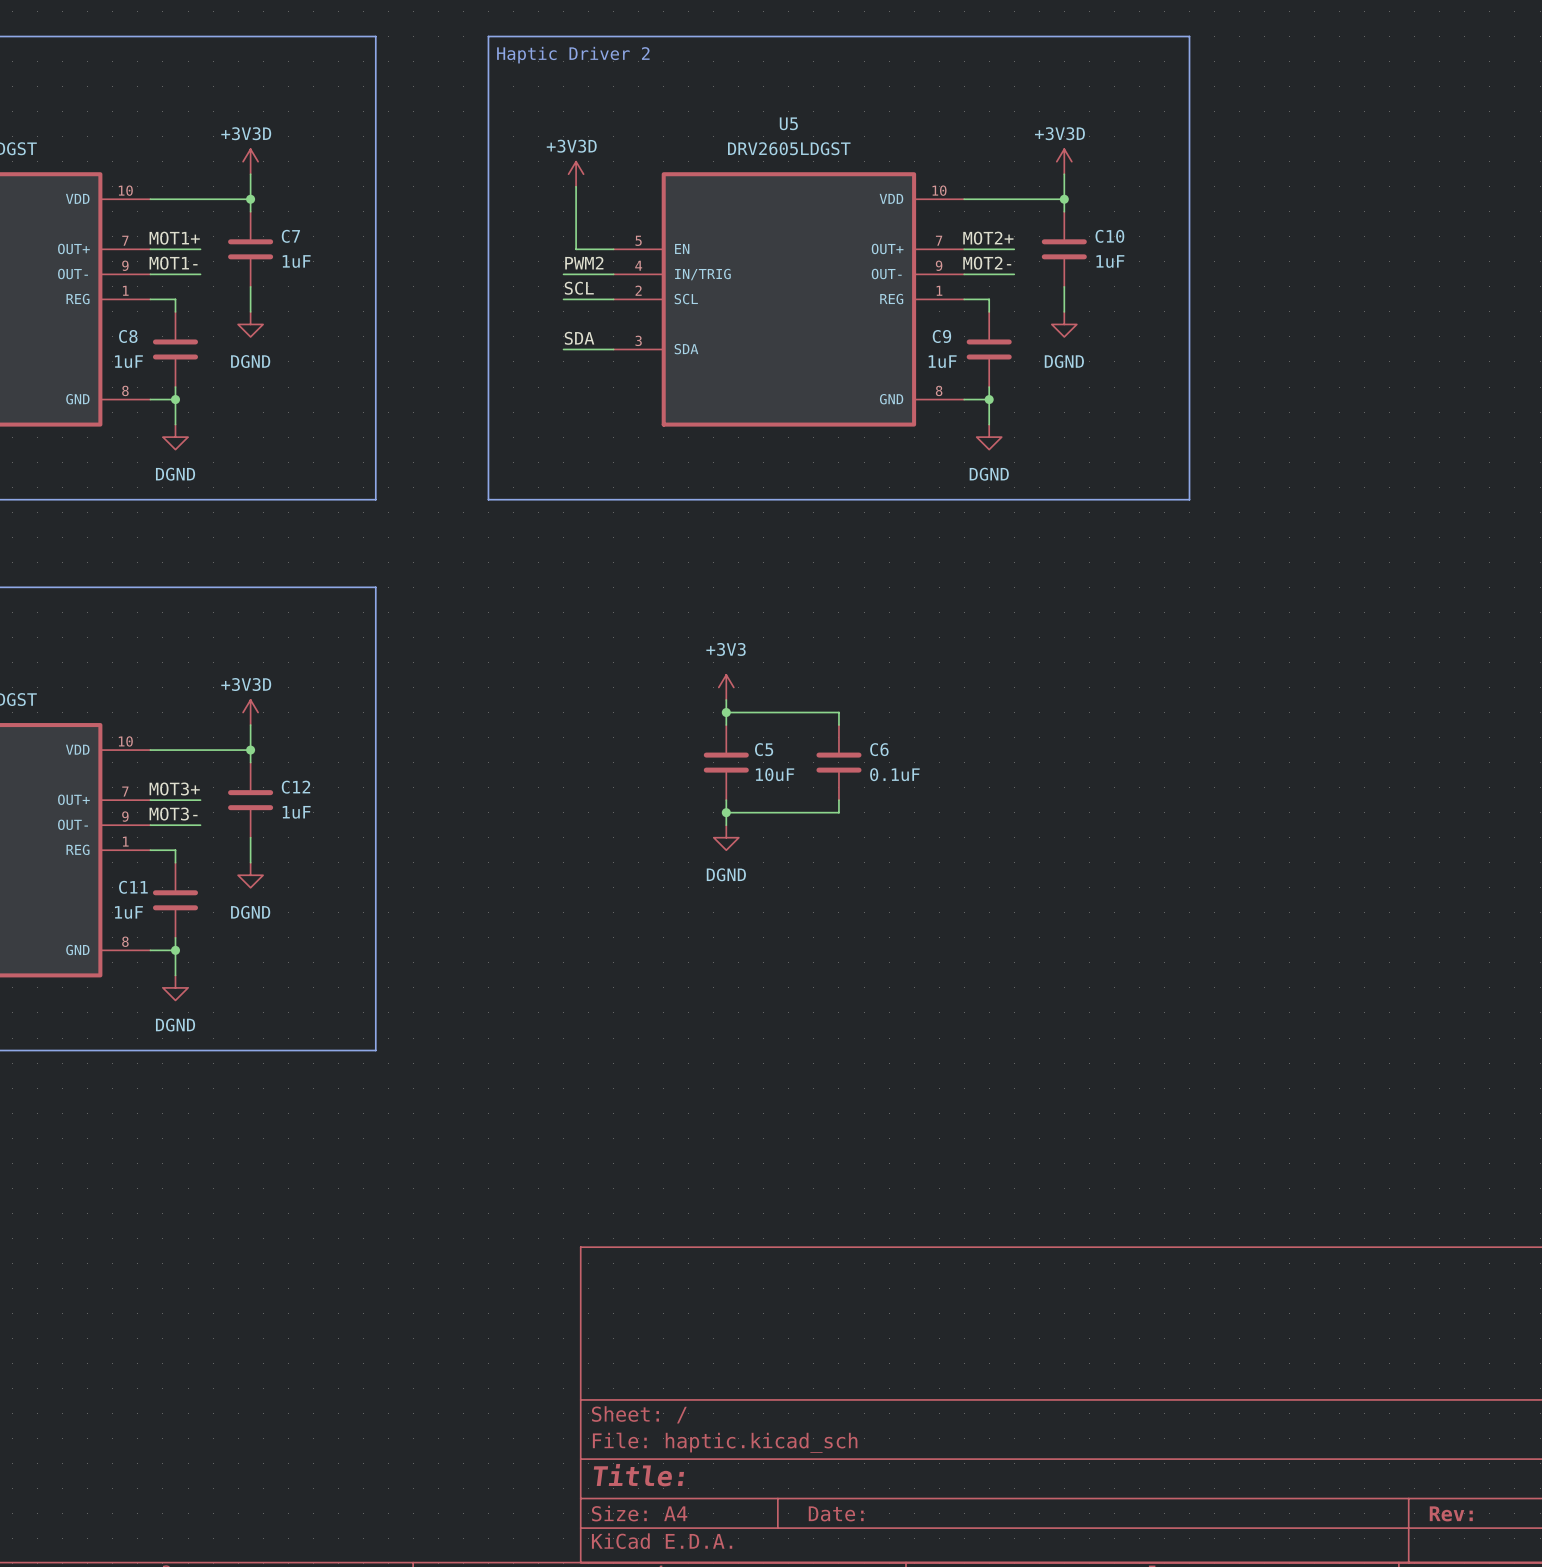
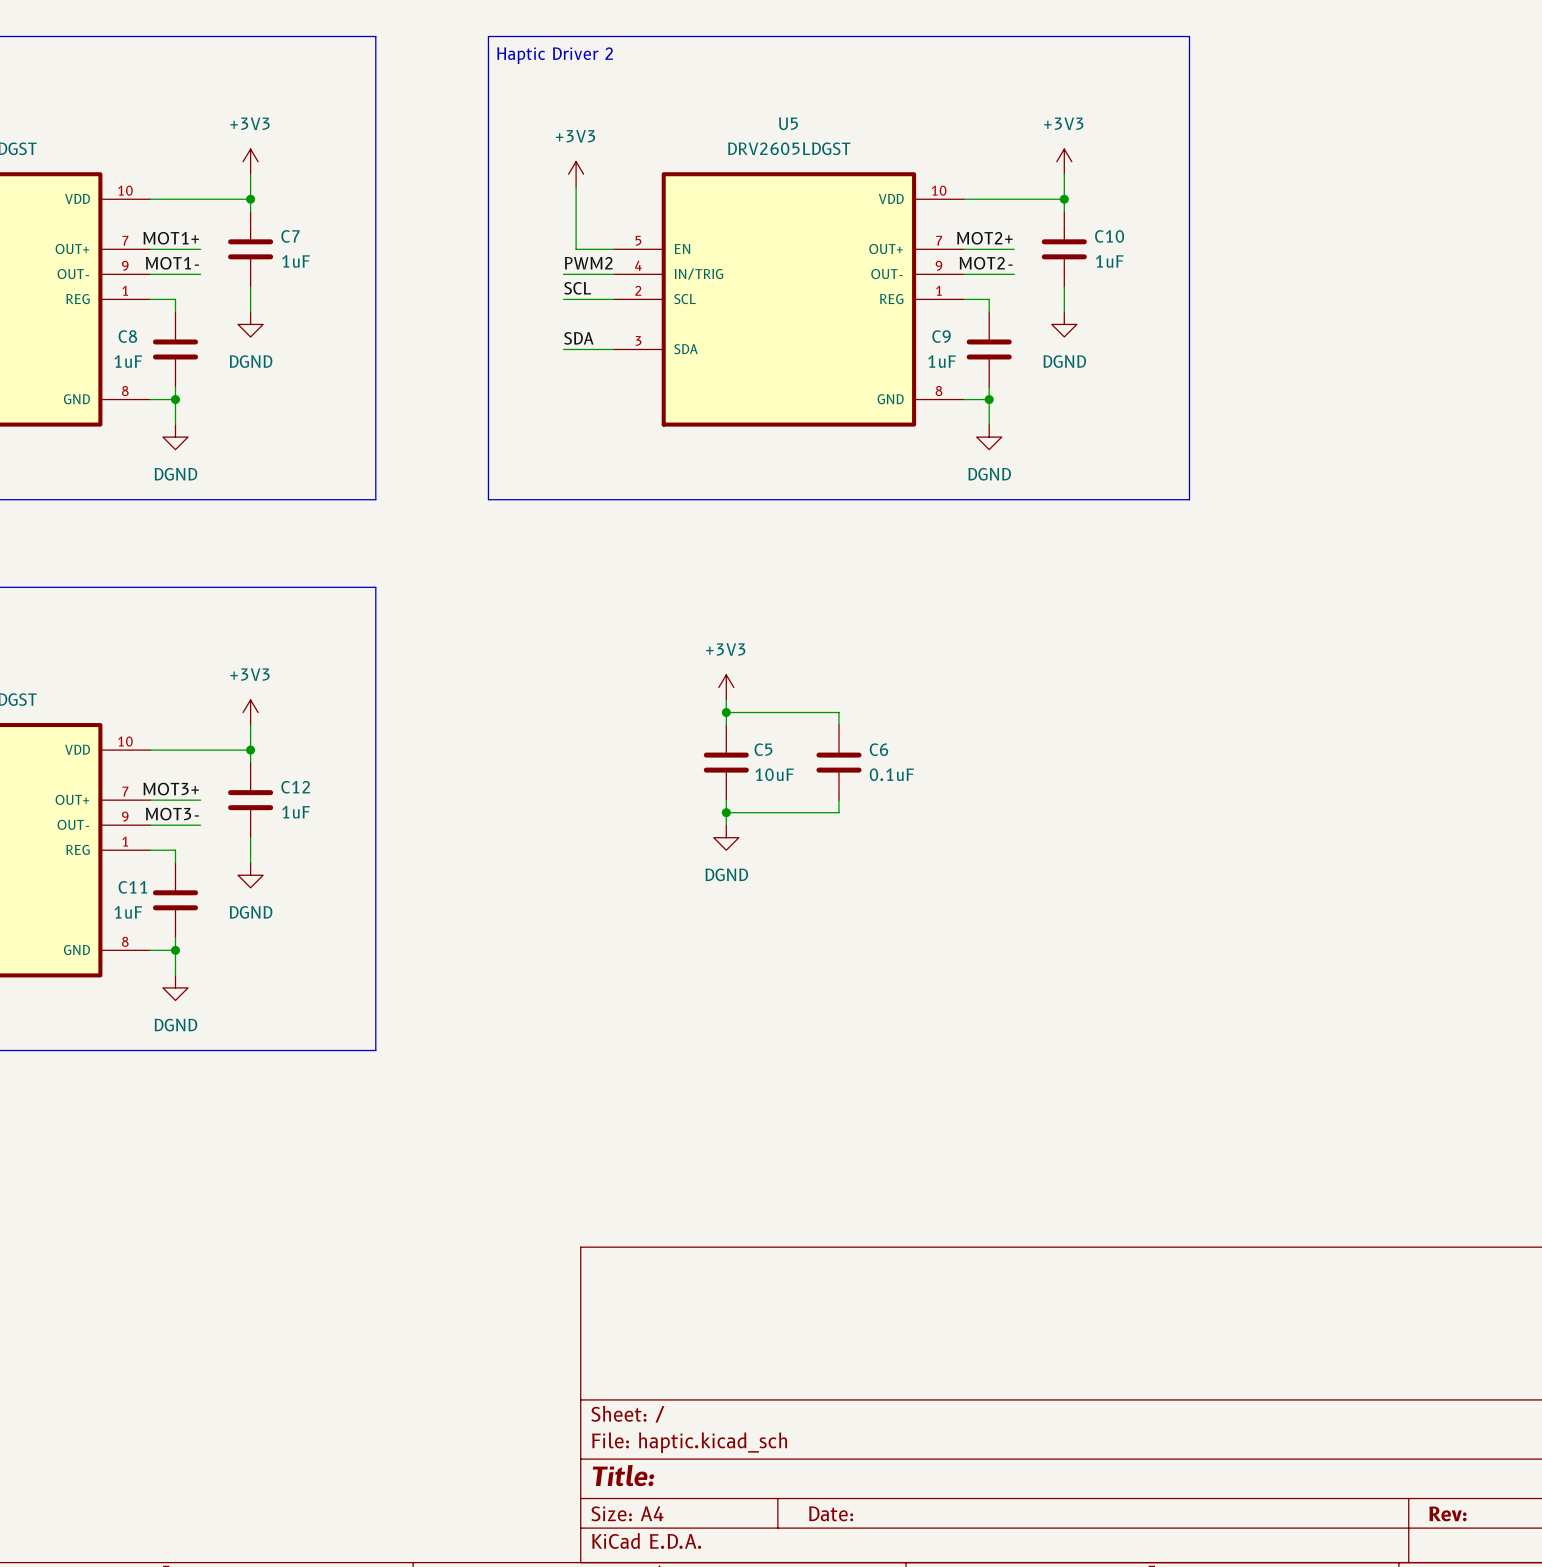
power symbol: +3V3D (250, 161) -> +3V3 (250, 161)
power symbol: +3V3D (1064, 161) -> +3V3 (1064, 161)
power symbol: +3V3D (576, 174) -> +3V3 (576, 174)
power symbol: +3V3D (250, 712) -> +3V3 (250, 712)

